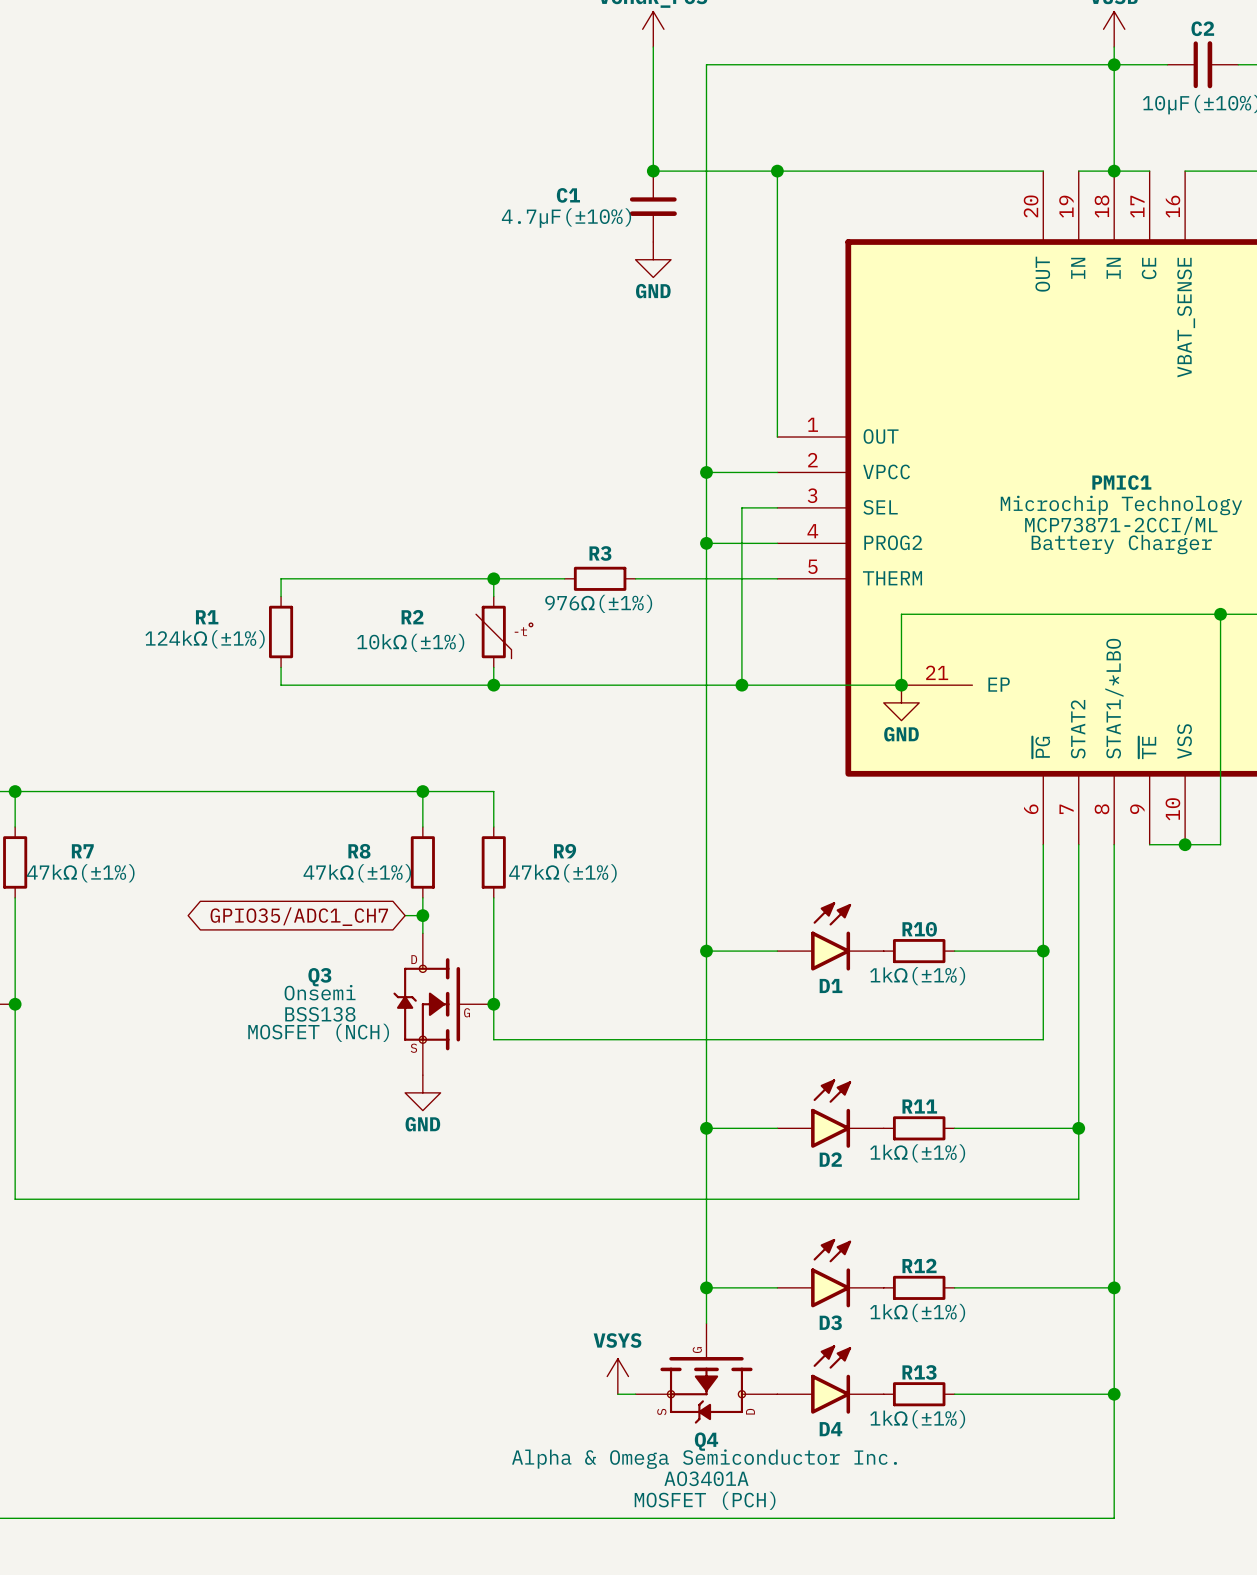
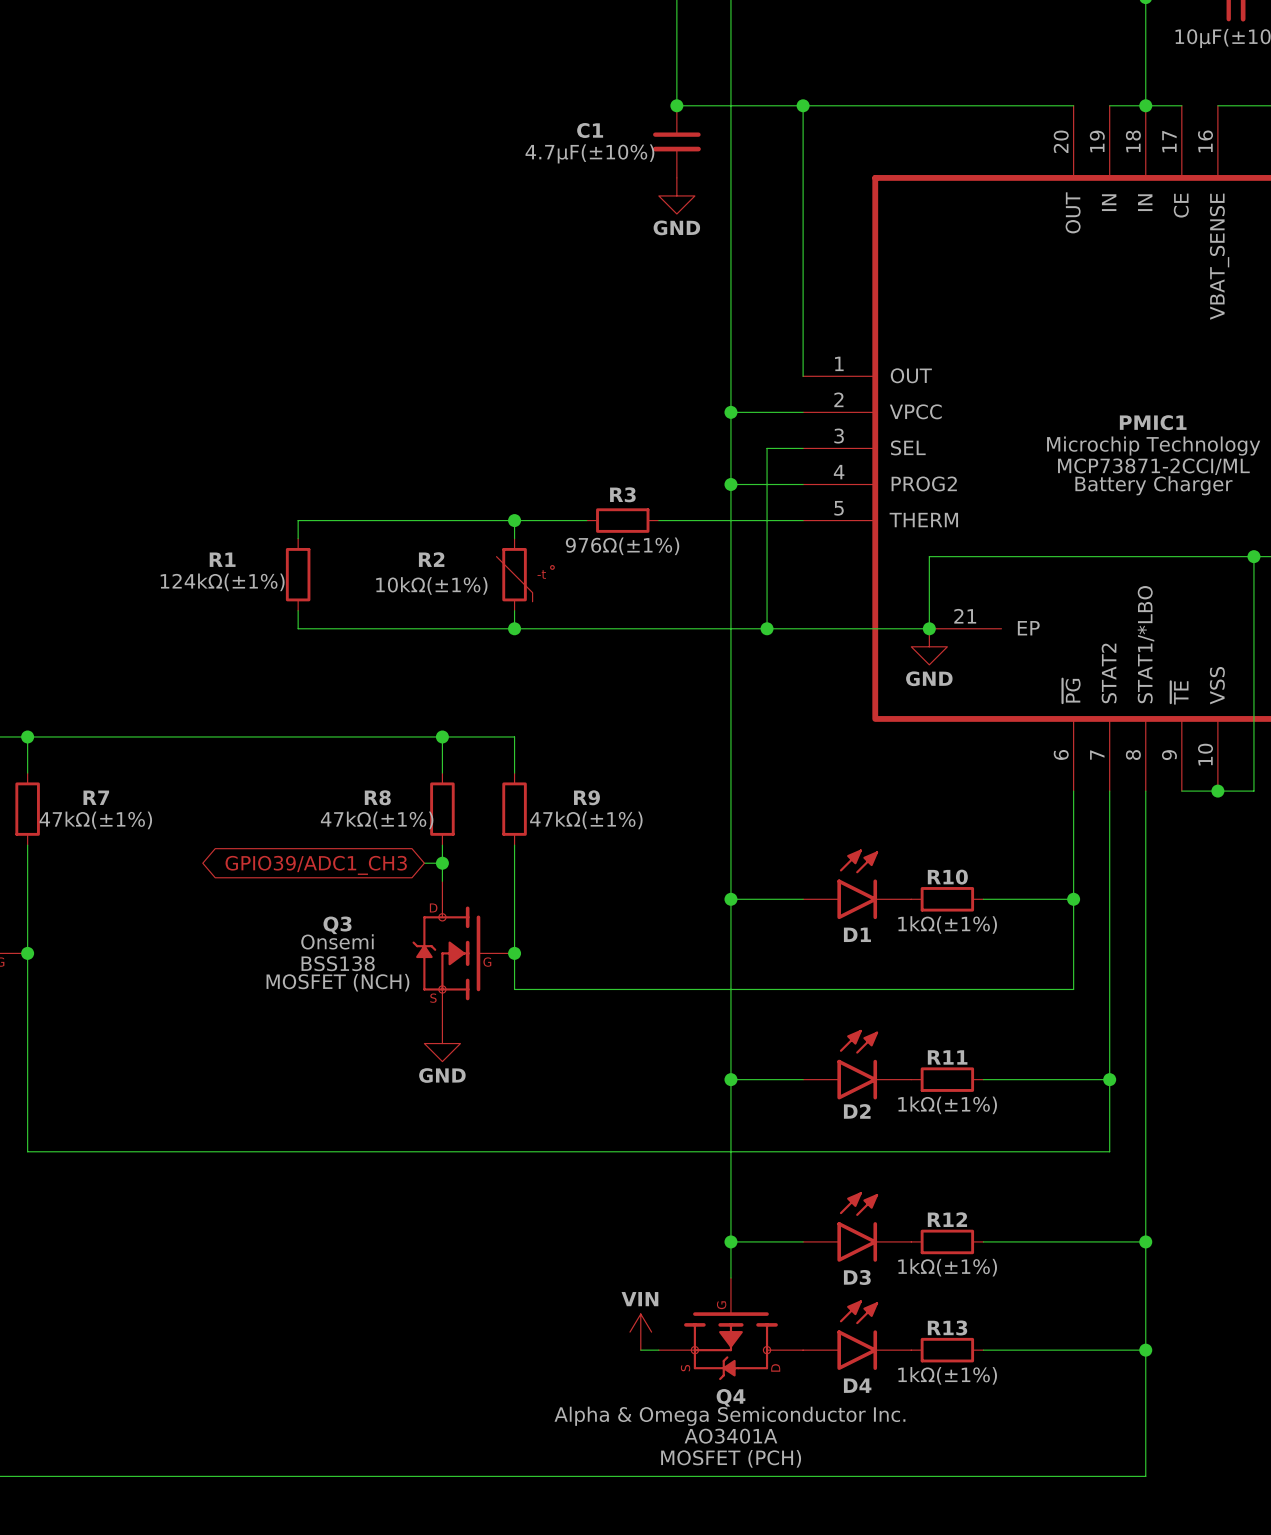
global label: GPIO35/ADC1_CH7 (299, 916) -> GPIO39/ADC1_CH3 (316, 865)
power symbol: VSYS (617, 1376) -> VIN (640, 1332)

